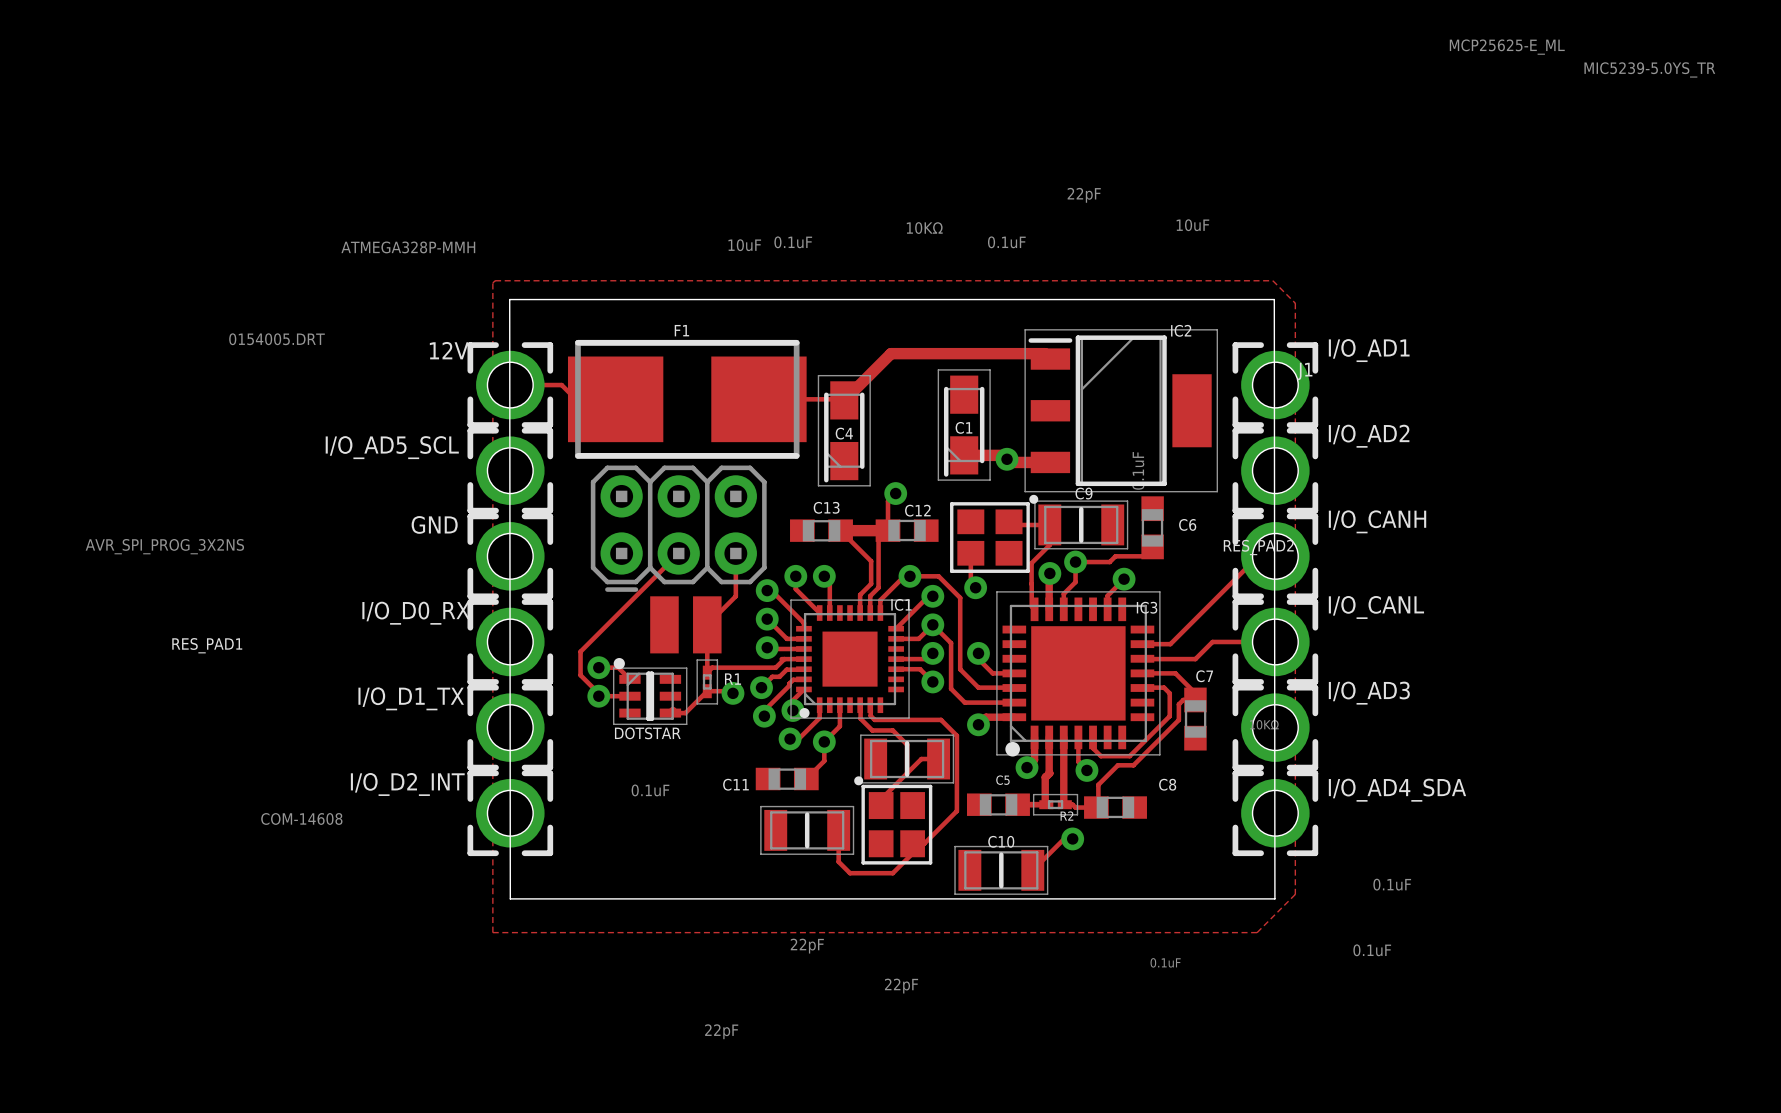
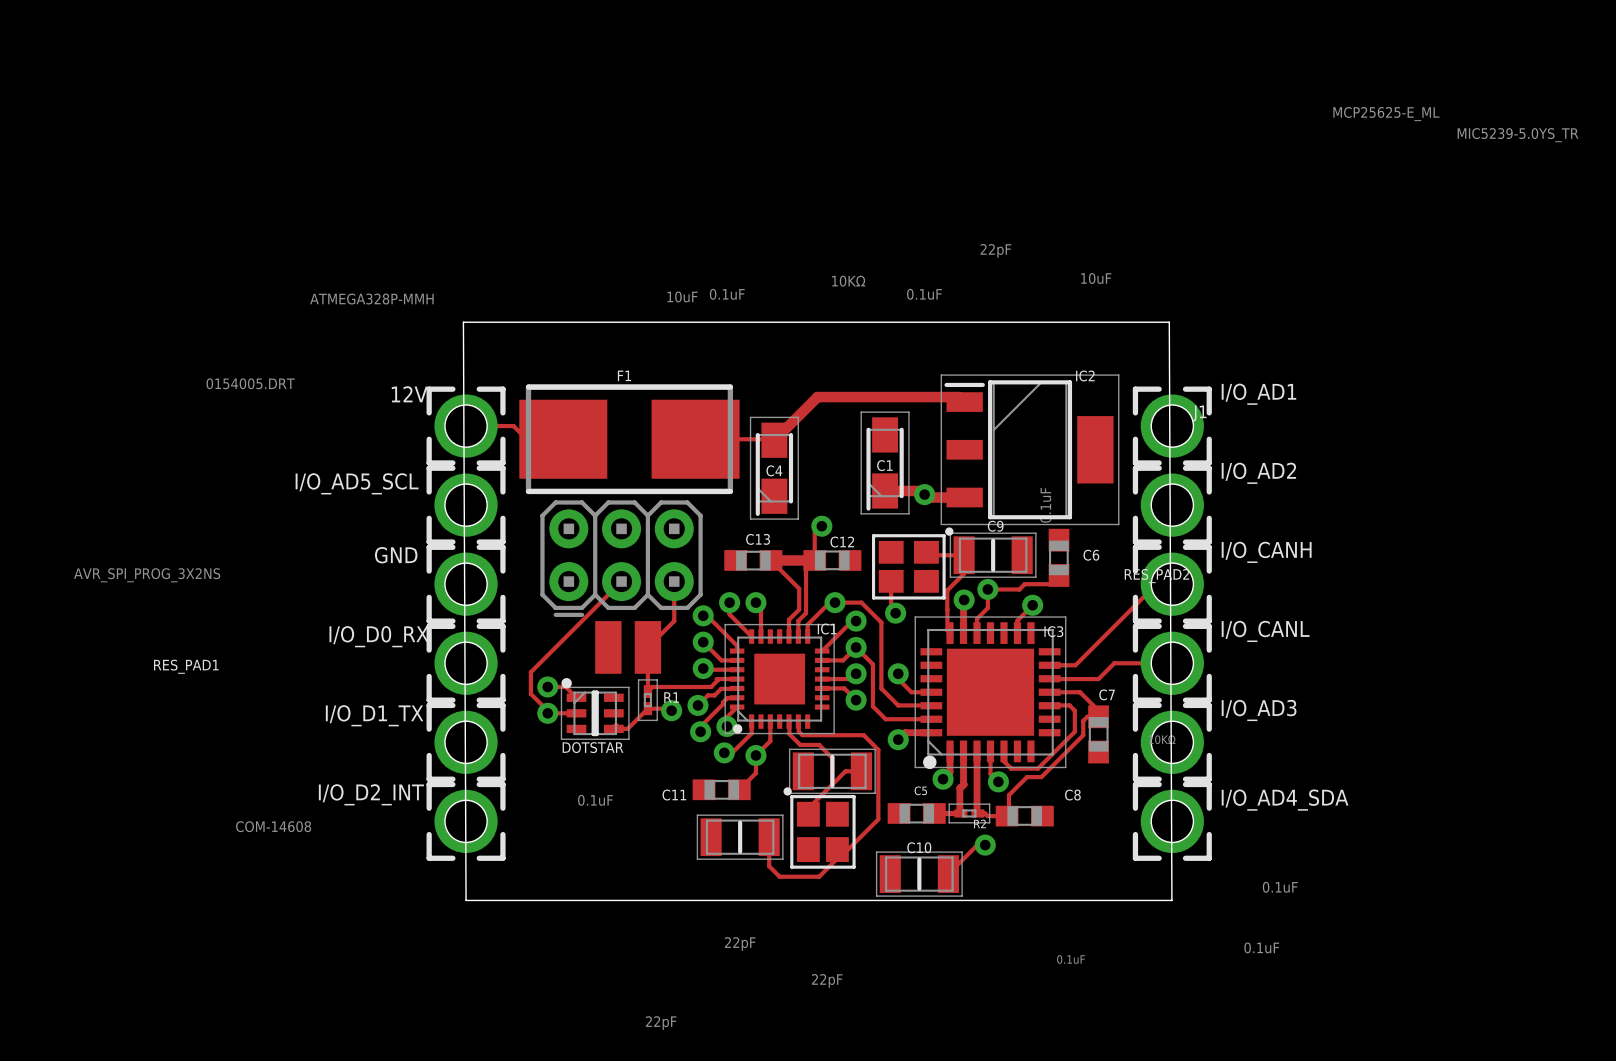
zone outline: (495, 280) (1272, 280) (1295, 303) (1295, 894) (1257, 932) (492, 932) (492, 283) (495, 280) -> none
board edge: (510, 898) (509, 299) (1274, 299) (1274, 898) -> (466, 900) (463, 322) (1169, 322) (1171, 900)

